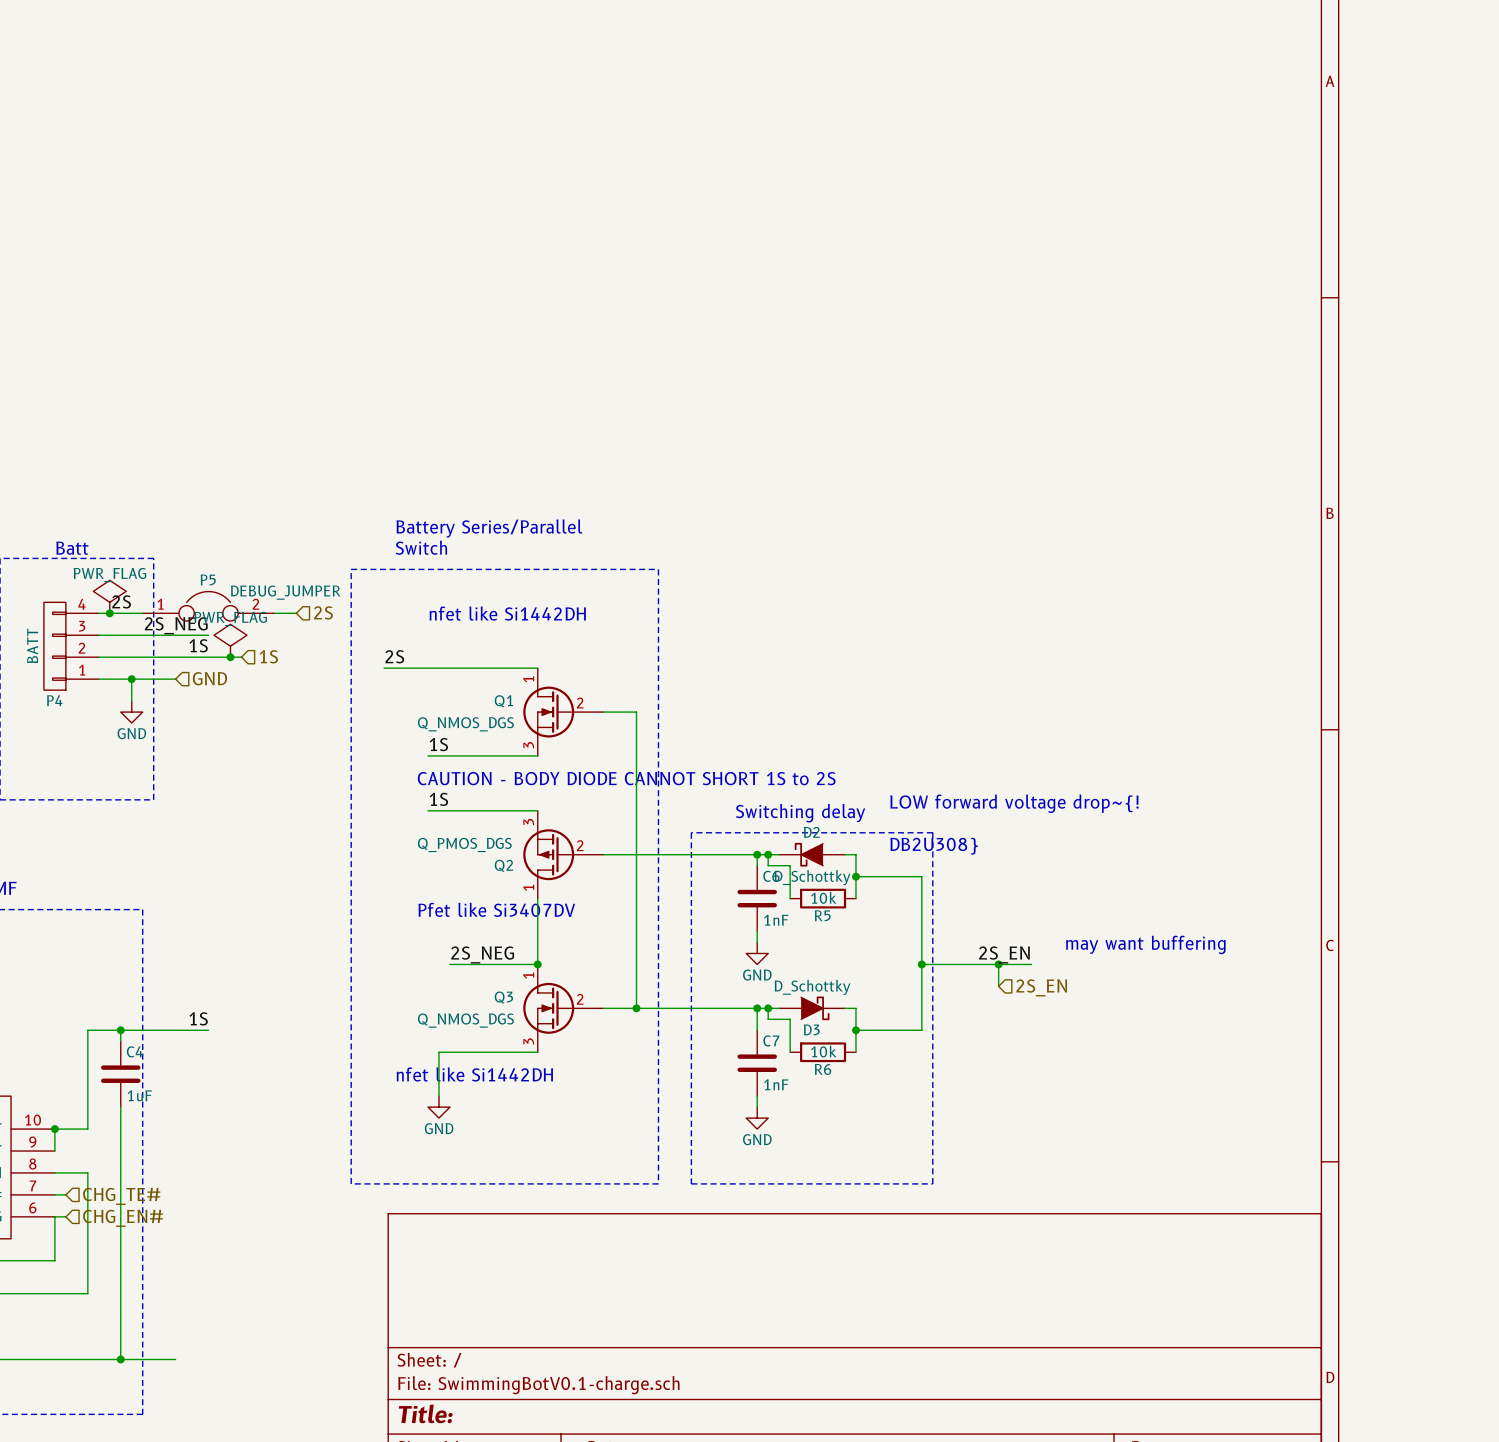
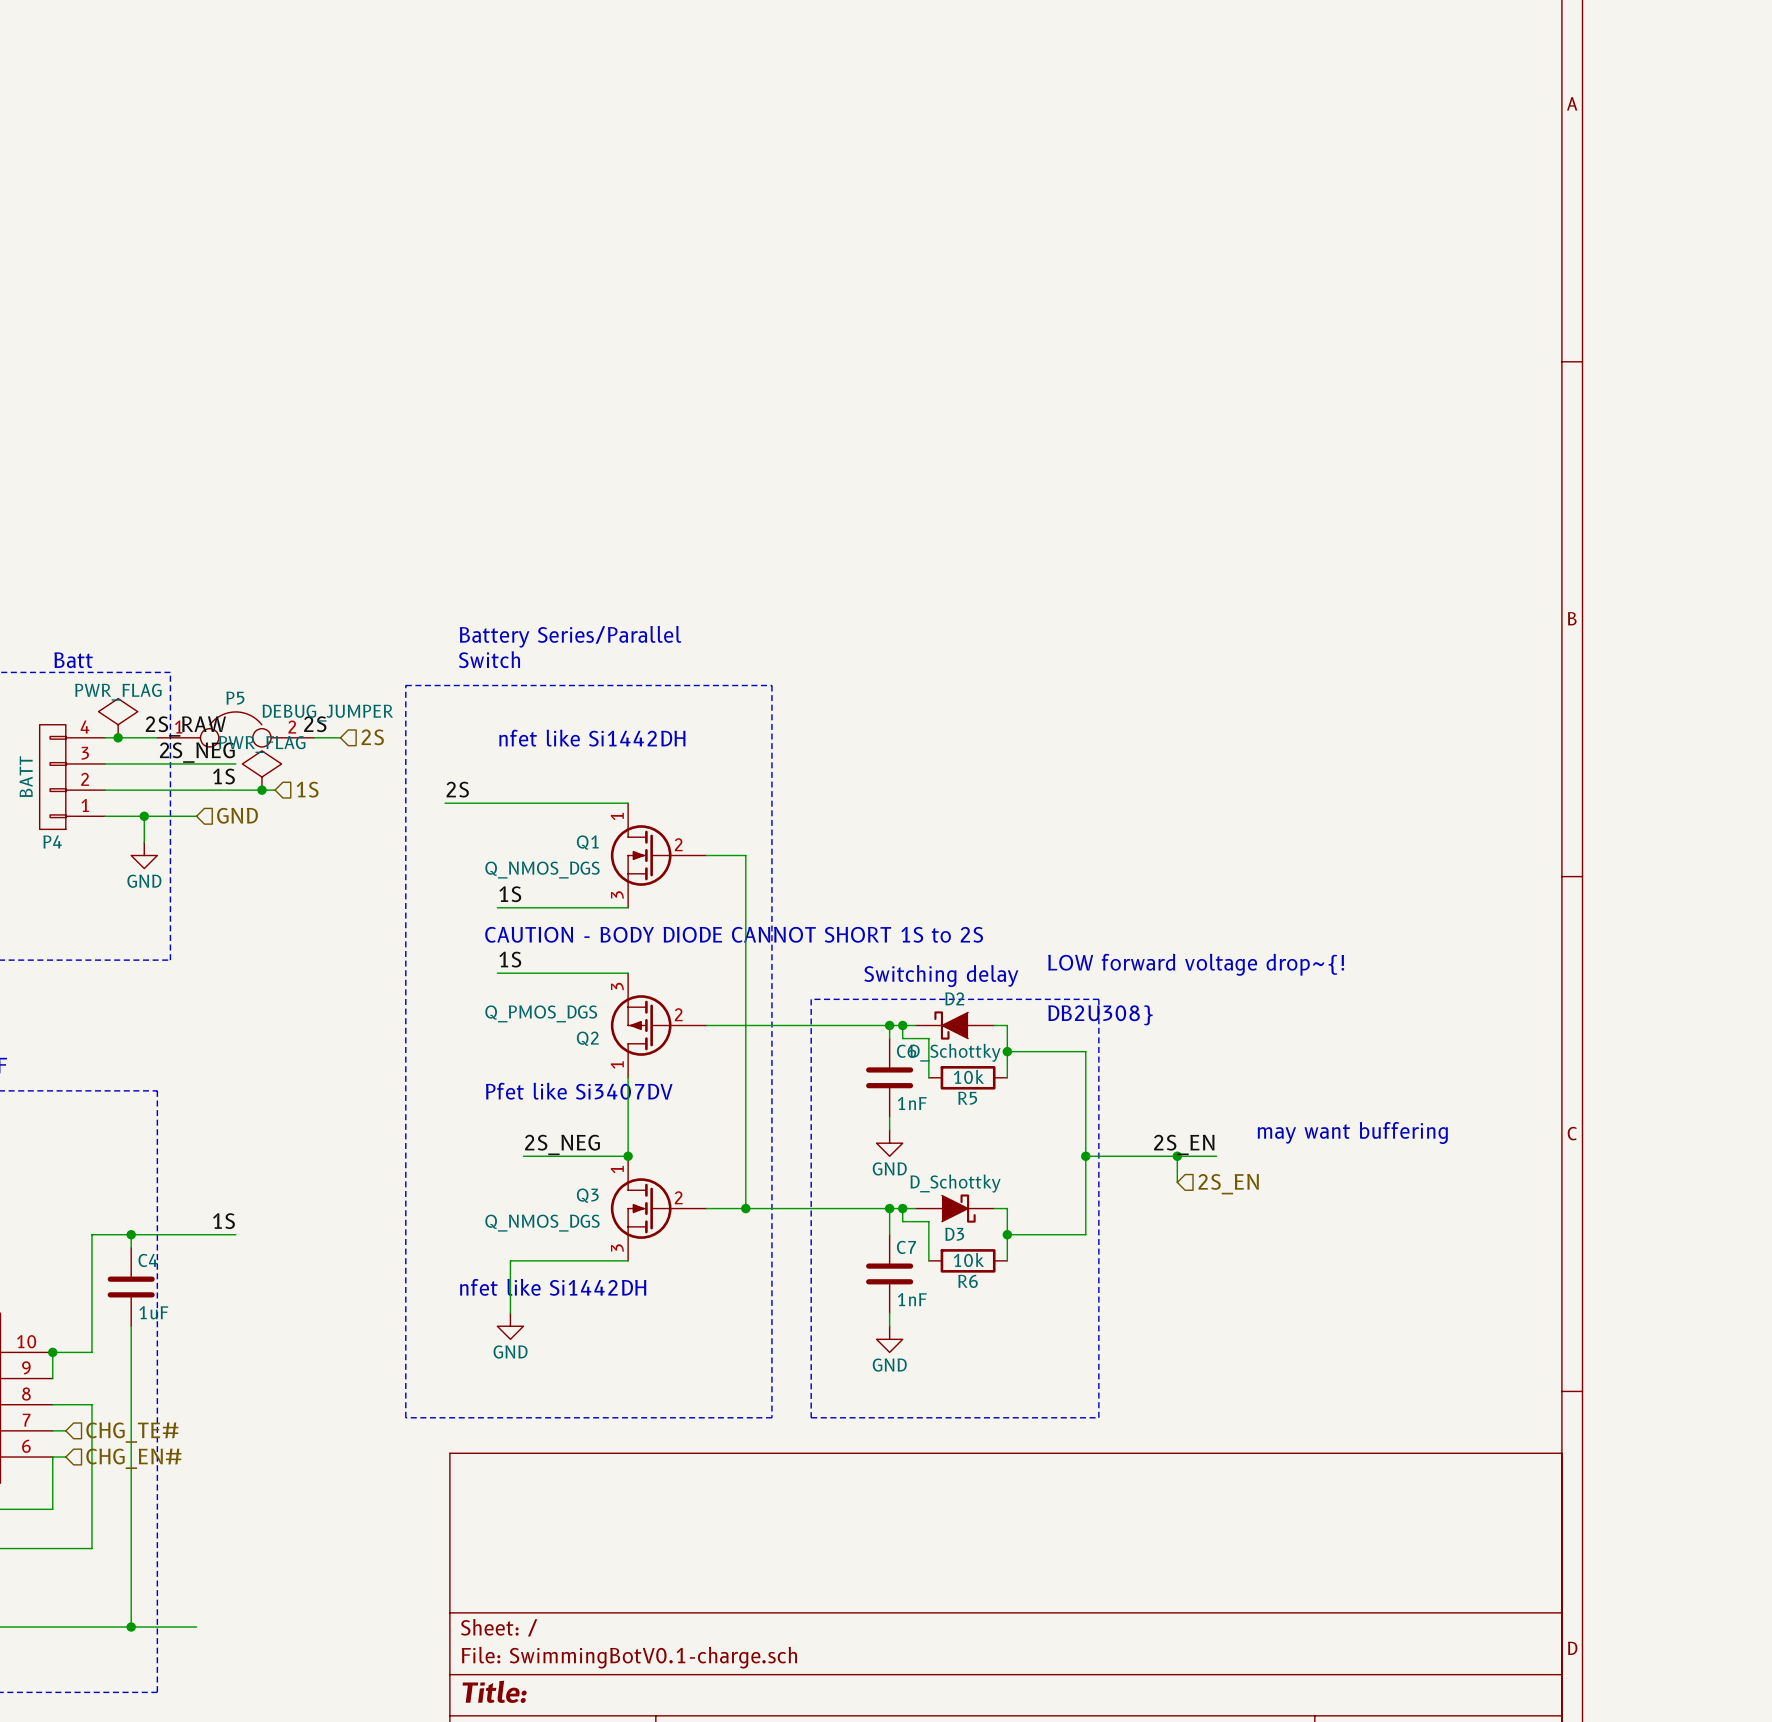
label: 2S (121, 601) -> 2S_RAW (185, 726)
label: none -> 2S (315, 724)

